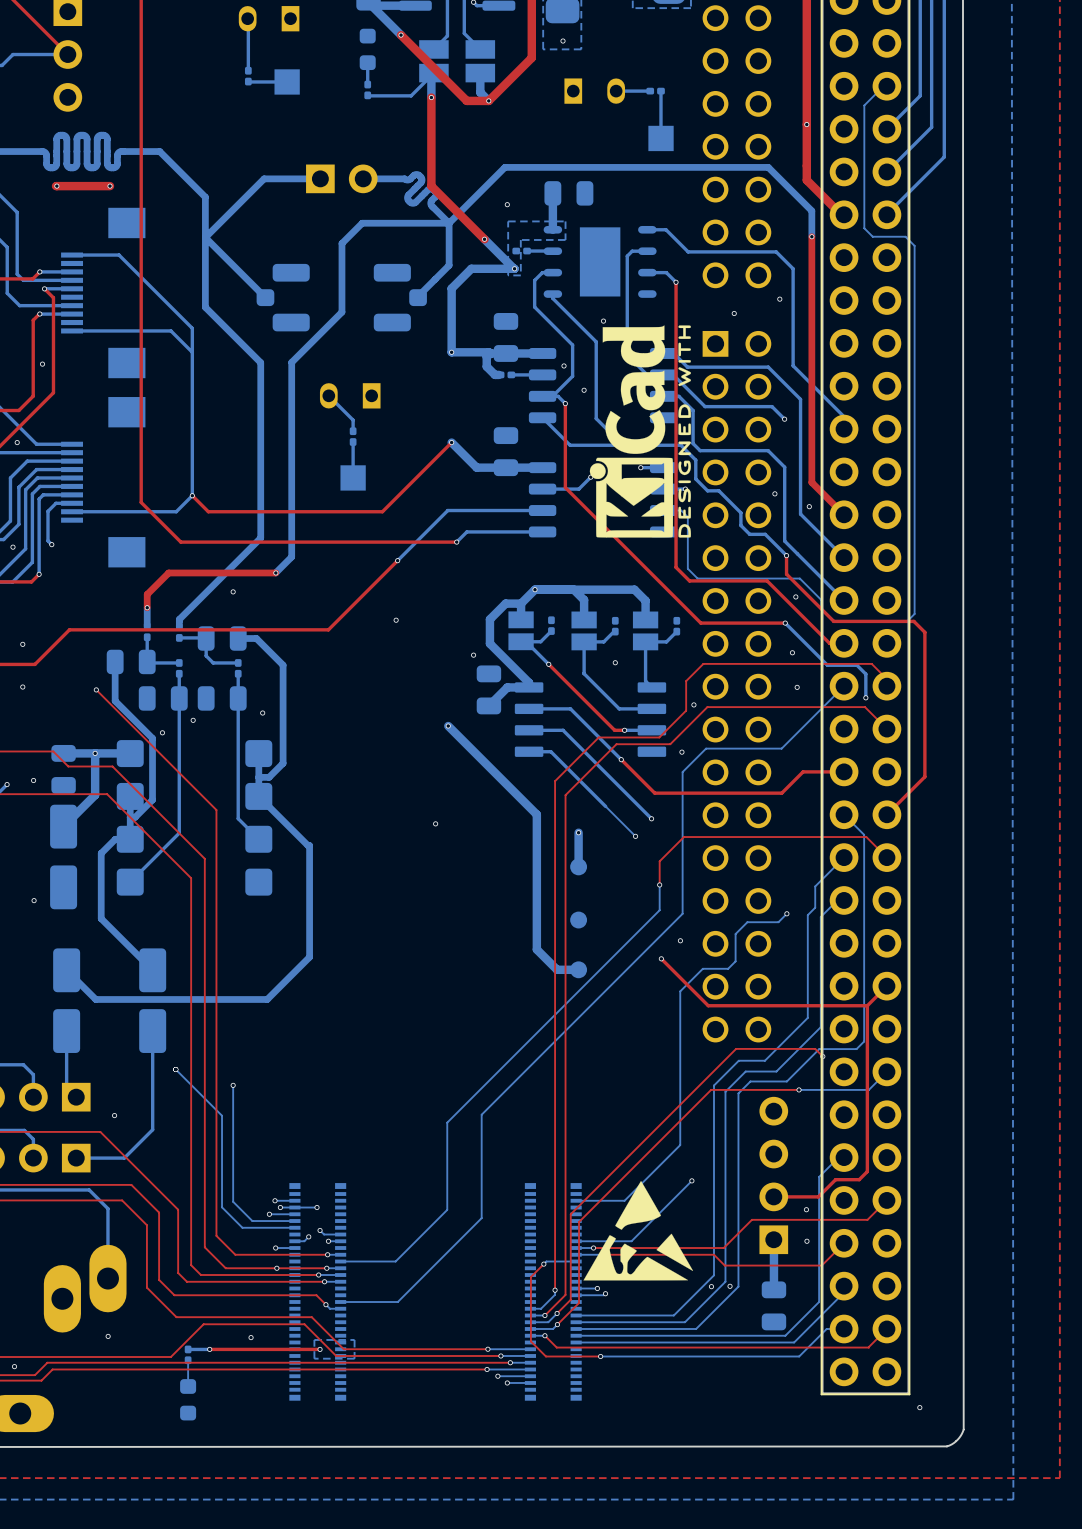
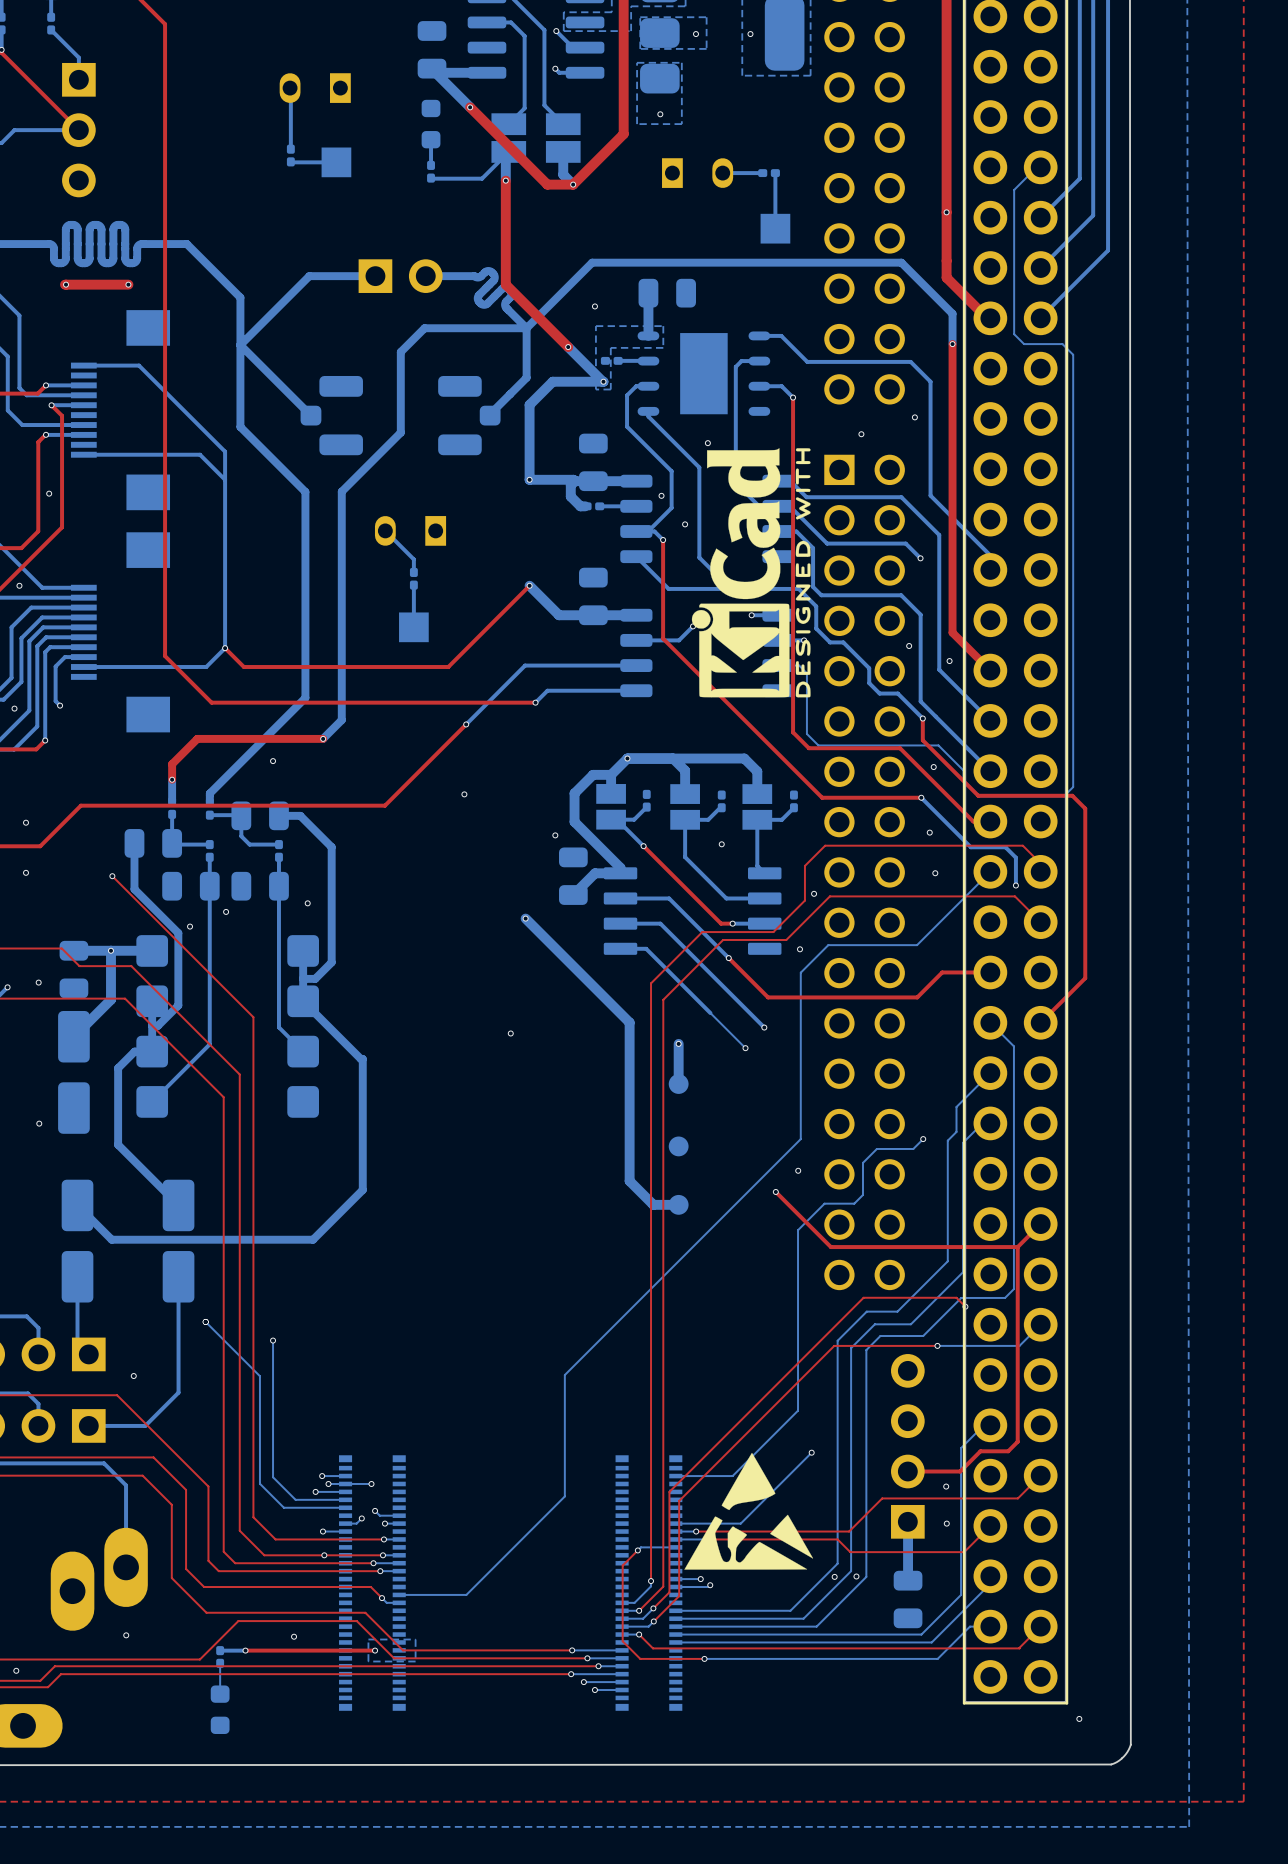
top track: (886, 857) (866, 837) (683, 837) (659, 861) (659, 884) -> none
bottom track: (659, 884) (659, 910) (447, 1122) (447, 1209) (395, 1261) (340, 1261) -> none
via: (659, 884) -> none

